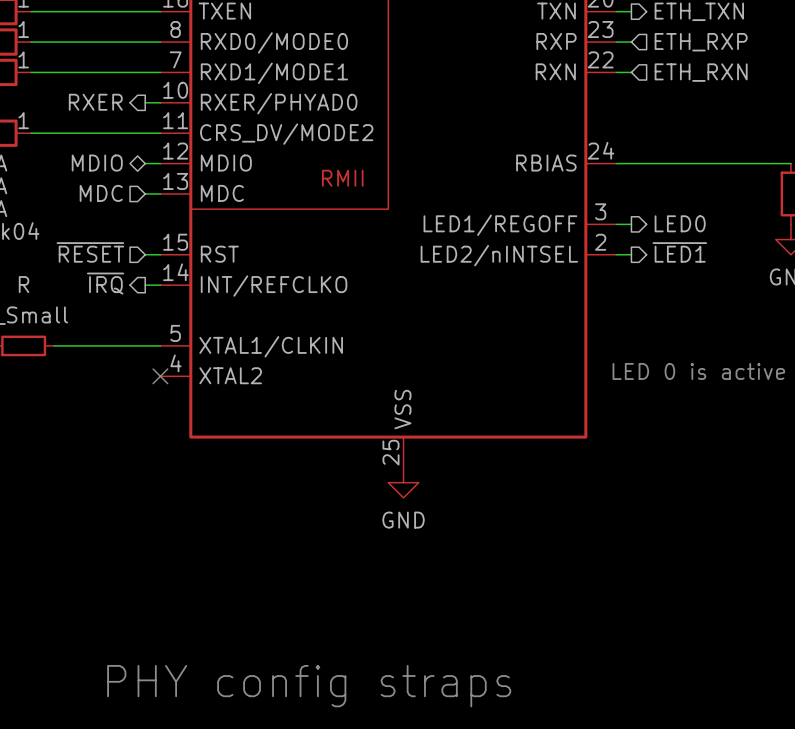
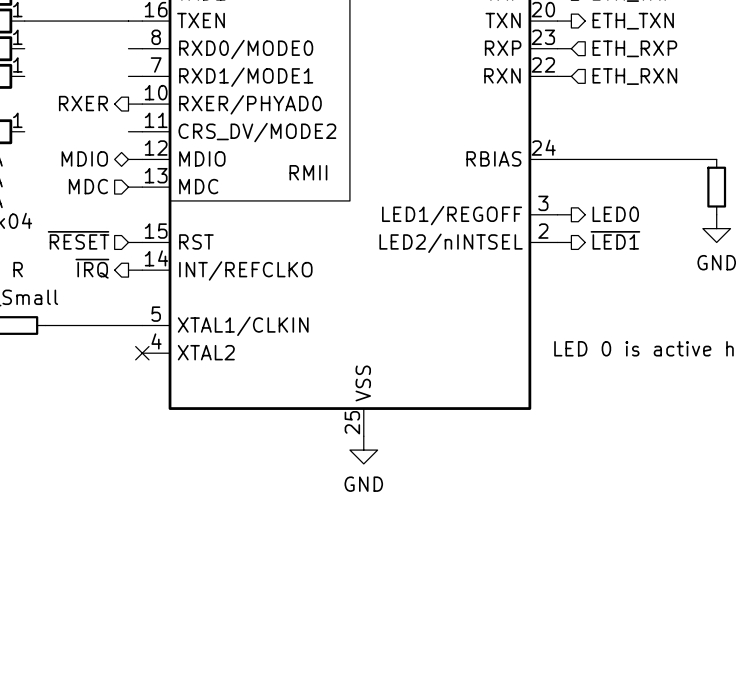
wire: (31, 42) (145, 42) -> none
wire: (31, 72) (145, 72) -> none
wire: (31, 133) (145, 133) -> none
text: PHY config straps (309, 686) -> none

